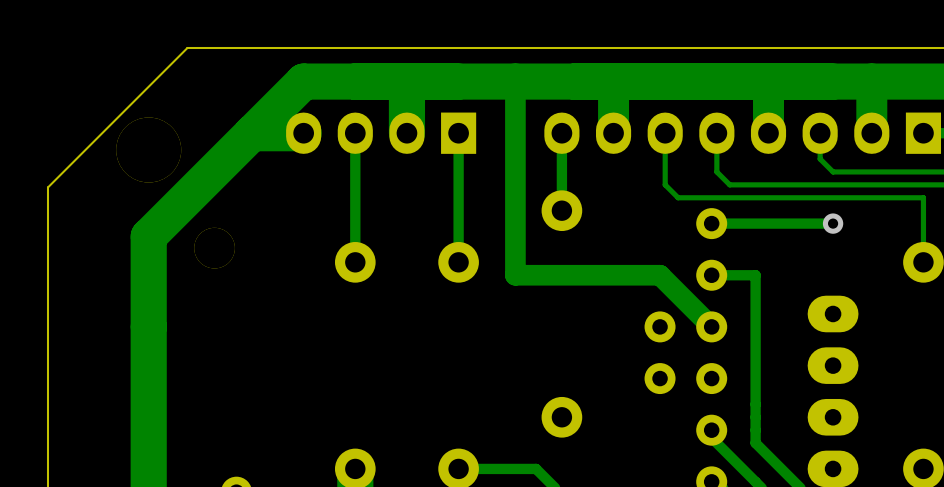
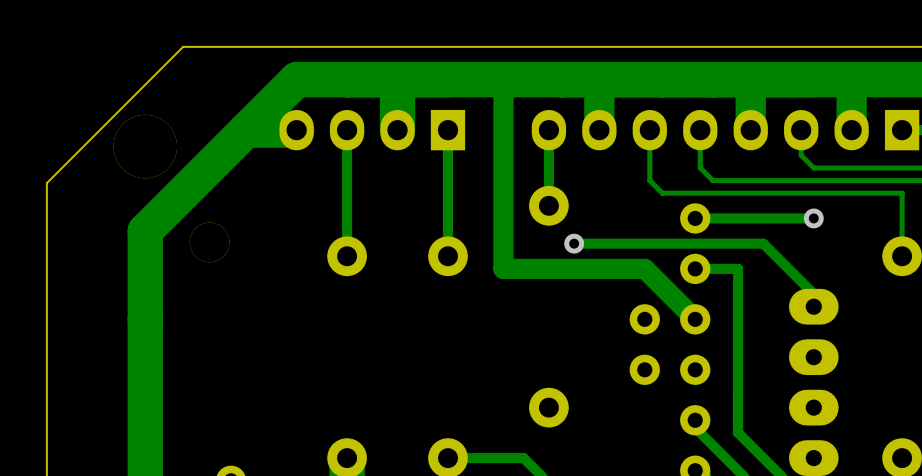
track: none -> (574, 243) (763, 243) (813, 294) (813, 306)
via: none -> (574, 243)

